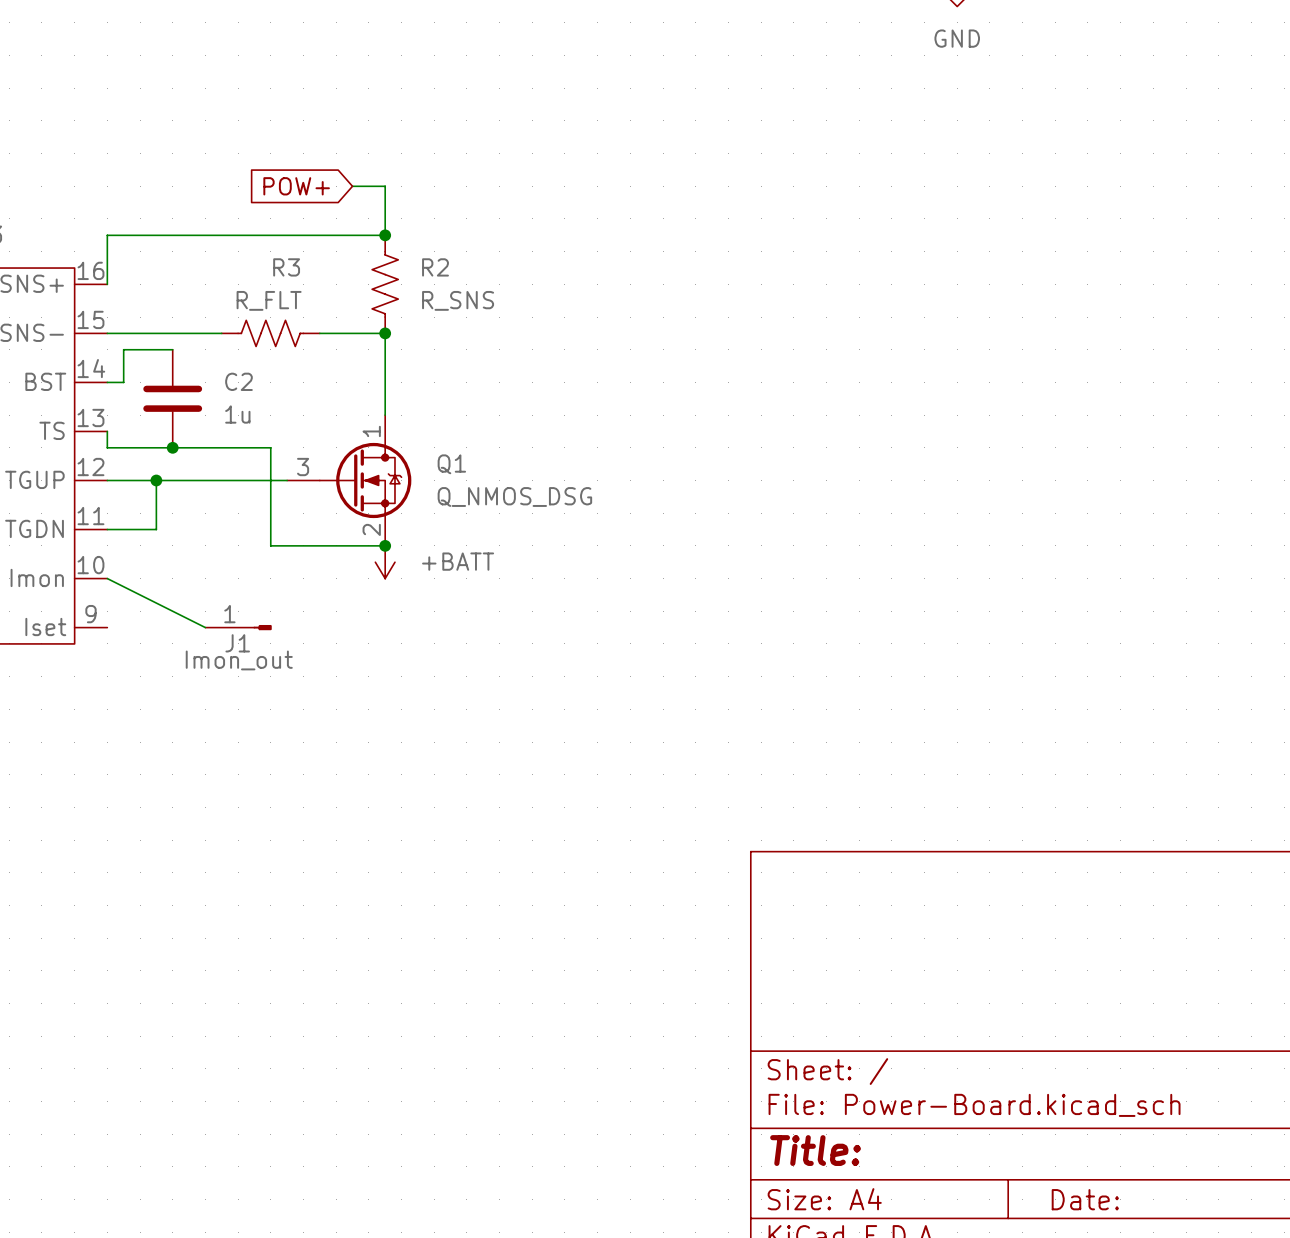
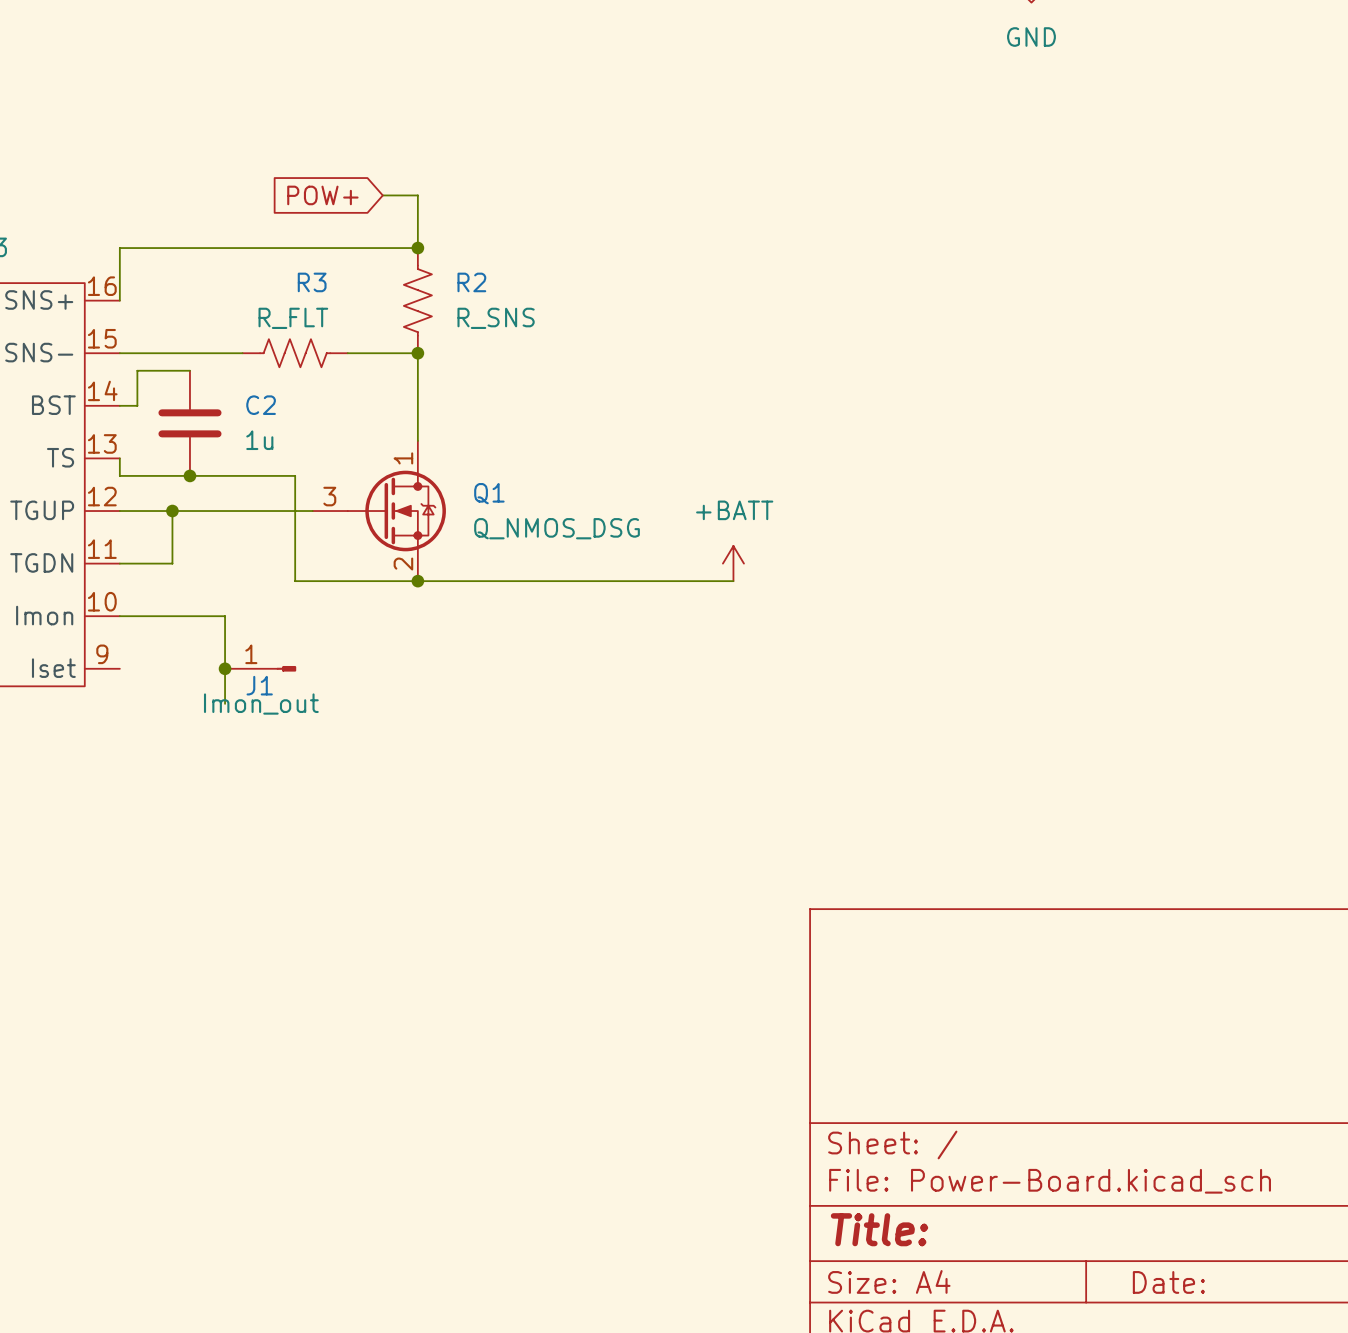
wire: none -> (417, 581) (733, 581)
power symbol text position: +BATT (458, 561) -> +BATT (734, 510)
power symbol rotation: 0° (385, 562) -> 180° (733, 563)
power symbol position: +BATT (385, 562) -> +BATT (733, 563)
wire: (107, 578) (205, 627) -> (119, 616) (225, 616) (225, 703)
junction: none -> (225, 668)

